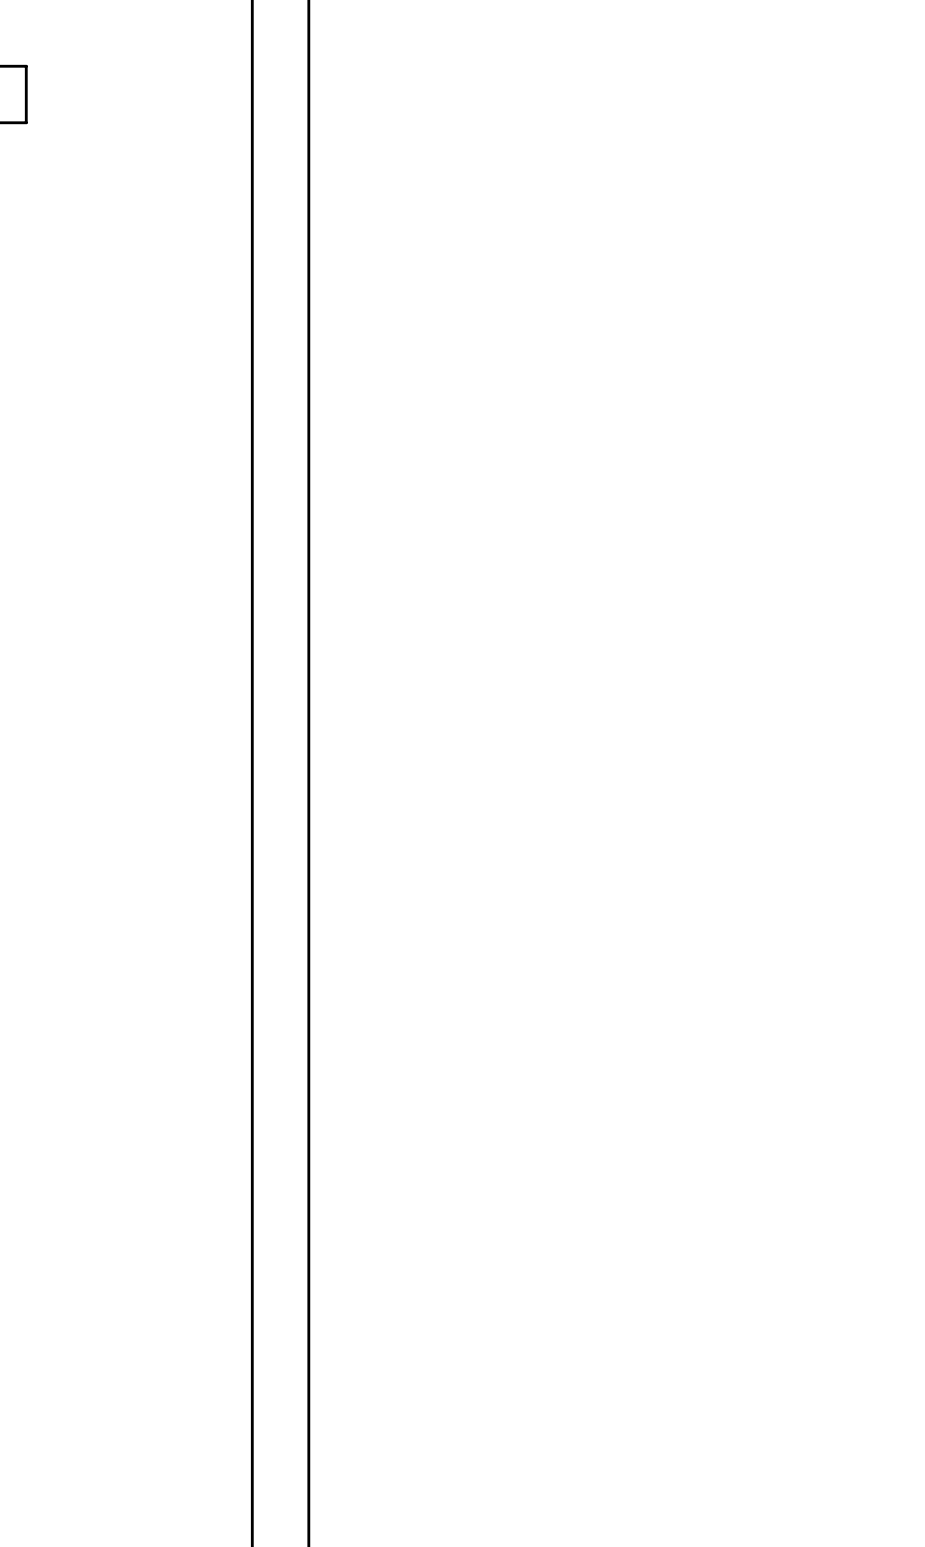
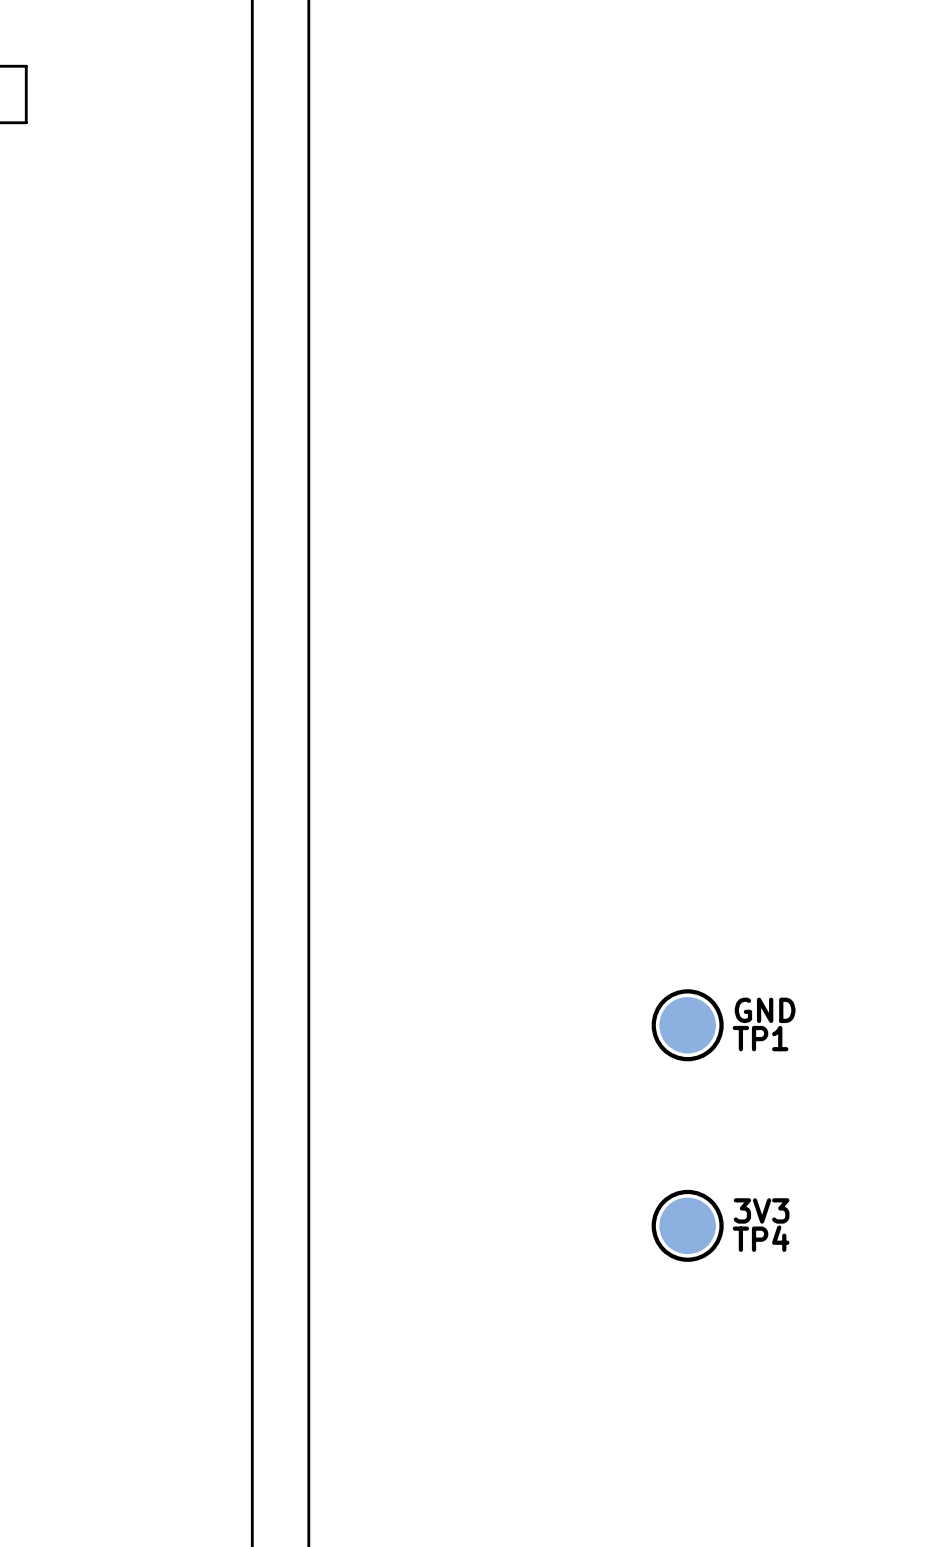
TP1: none -> GND (687, 1025)
TP4: none -> 3V3 (687, 1225)

